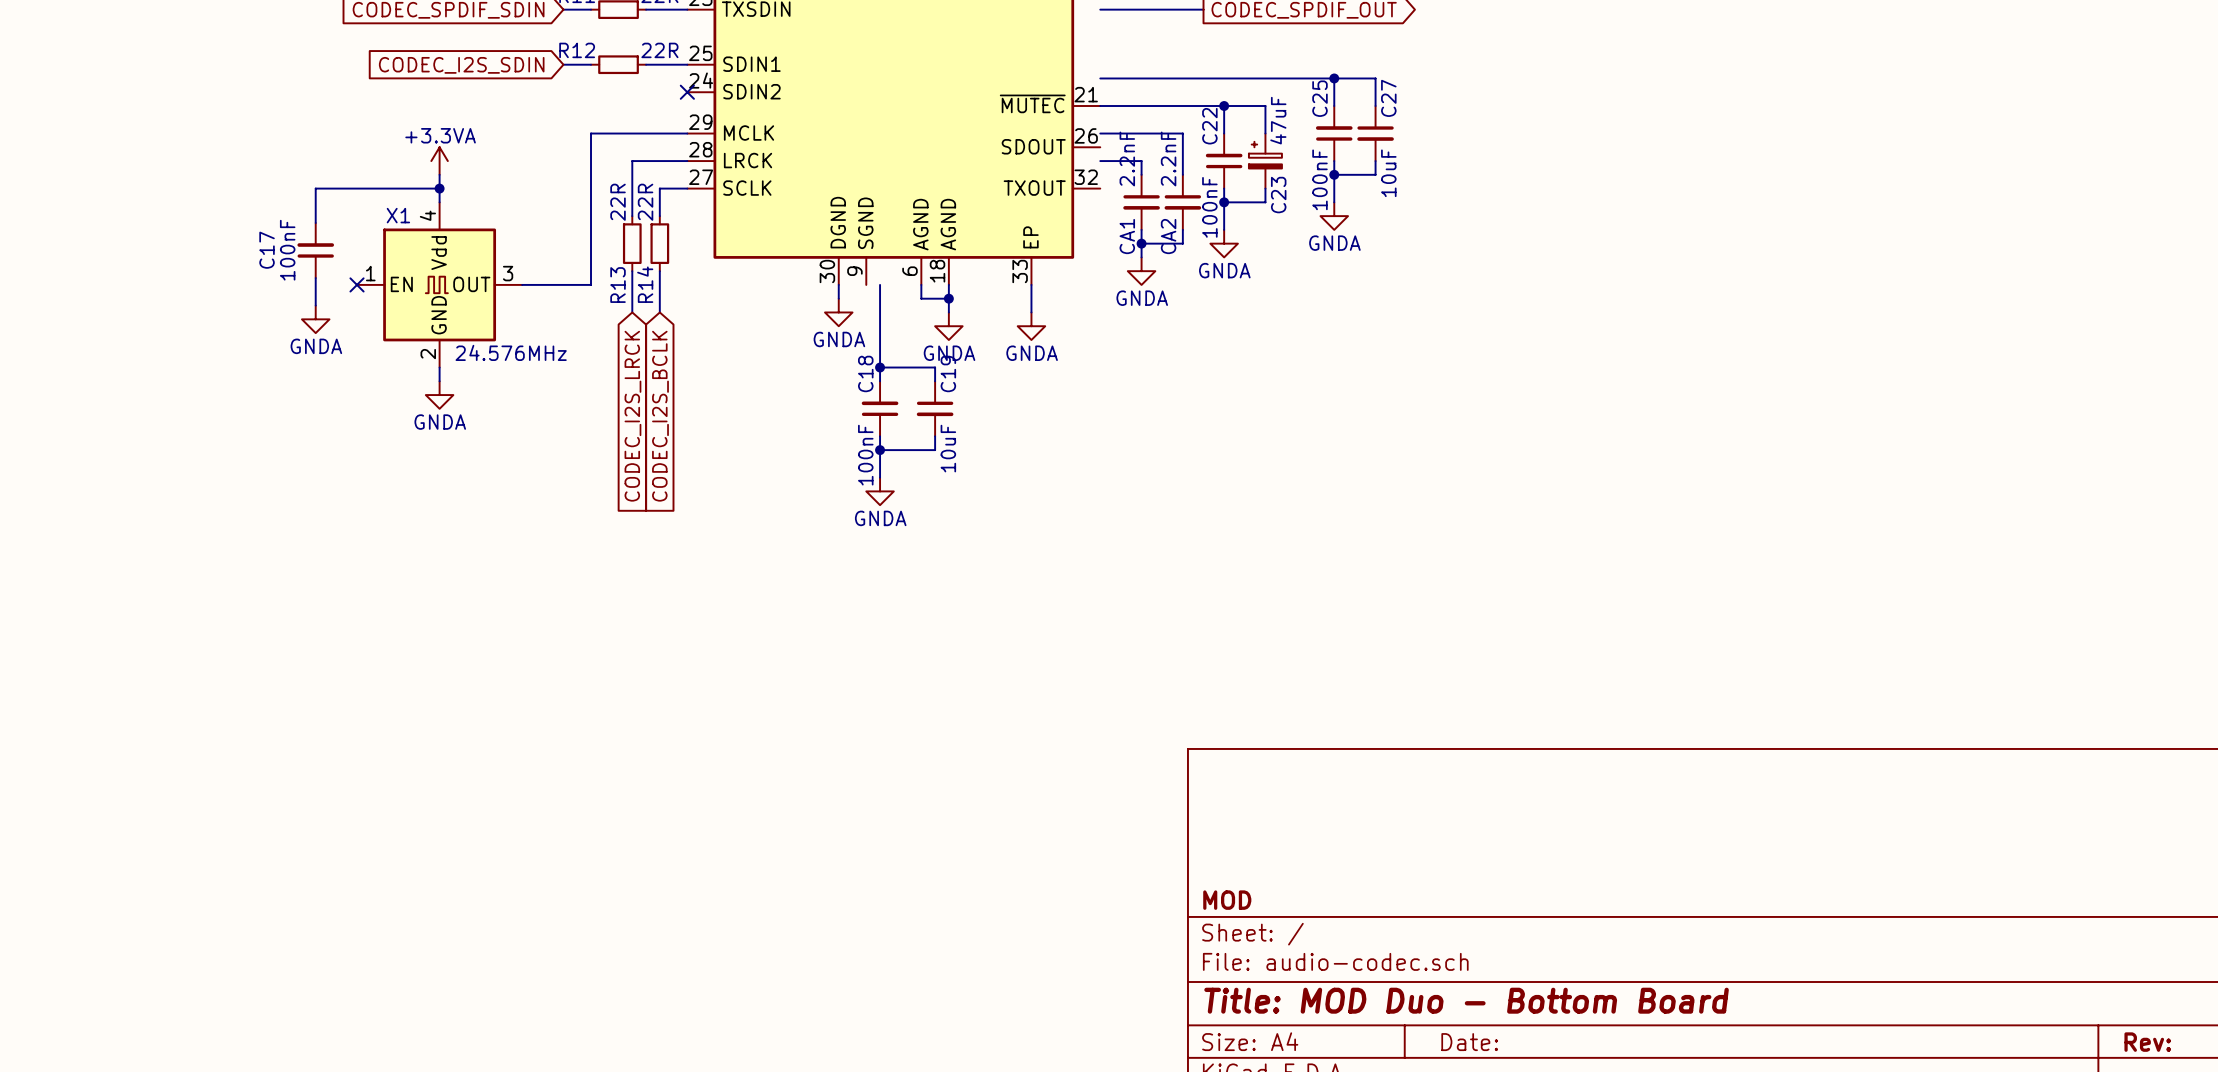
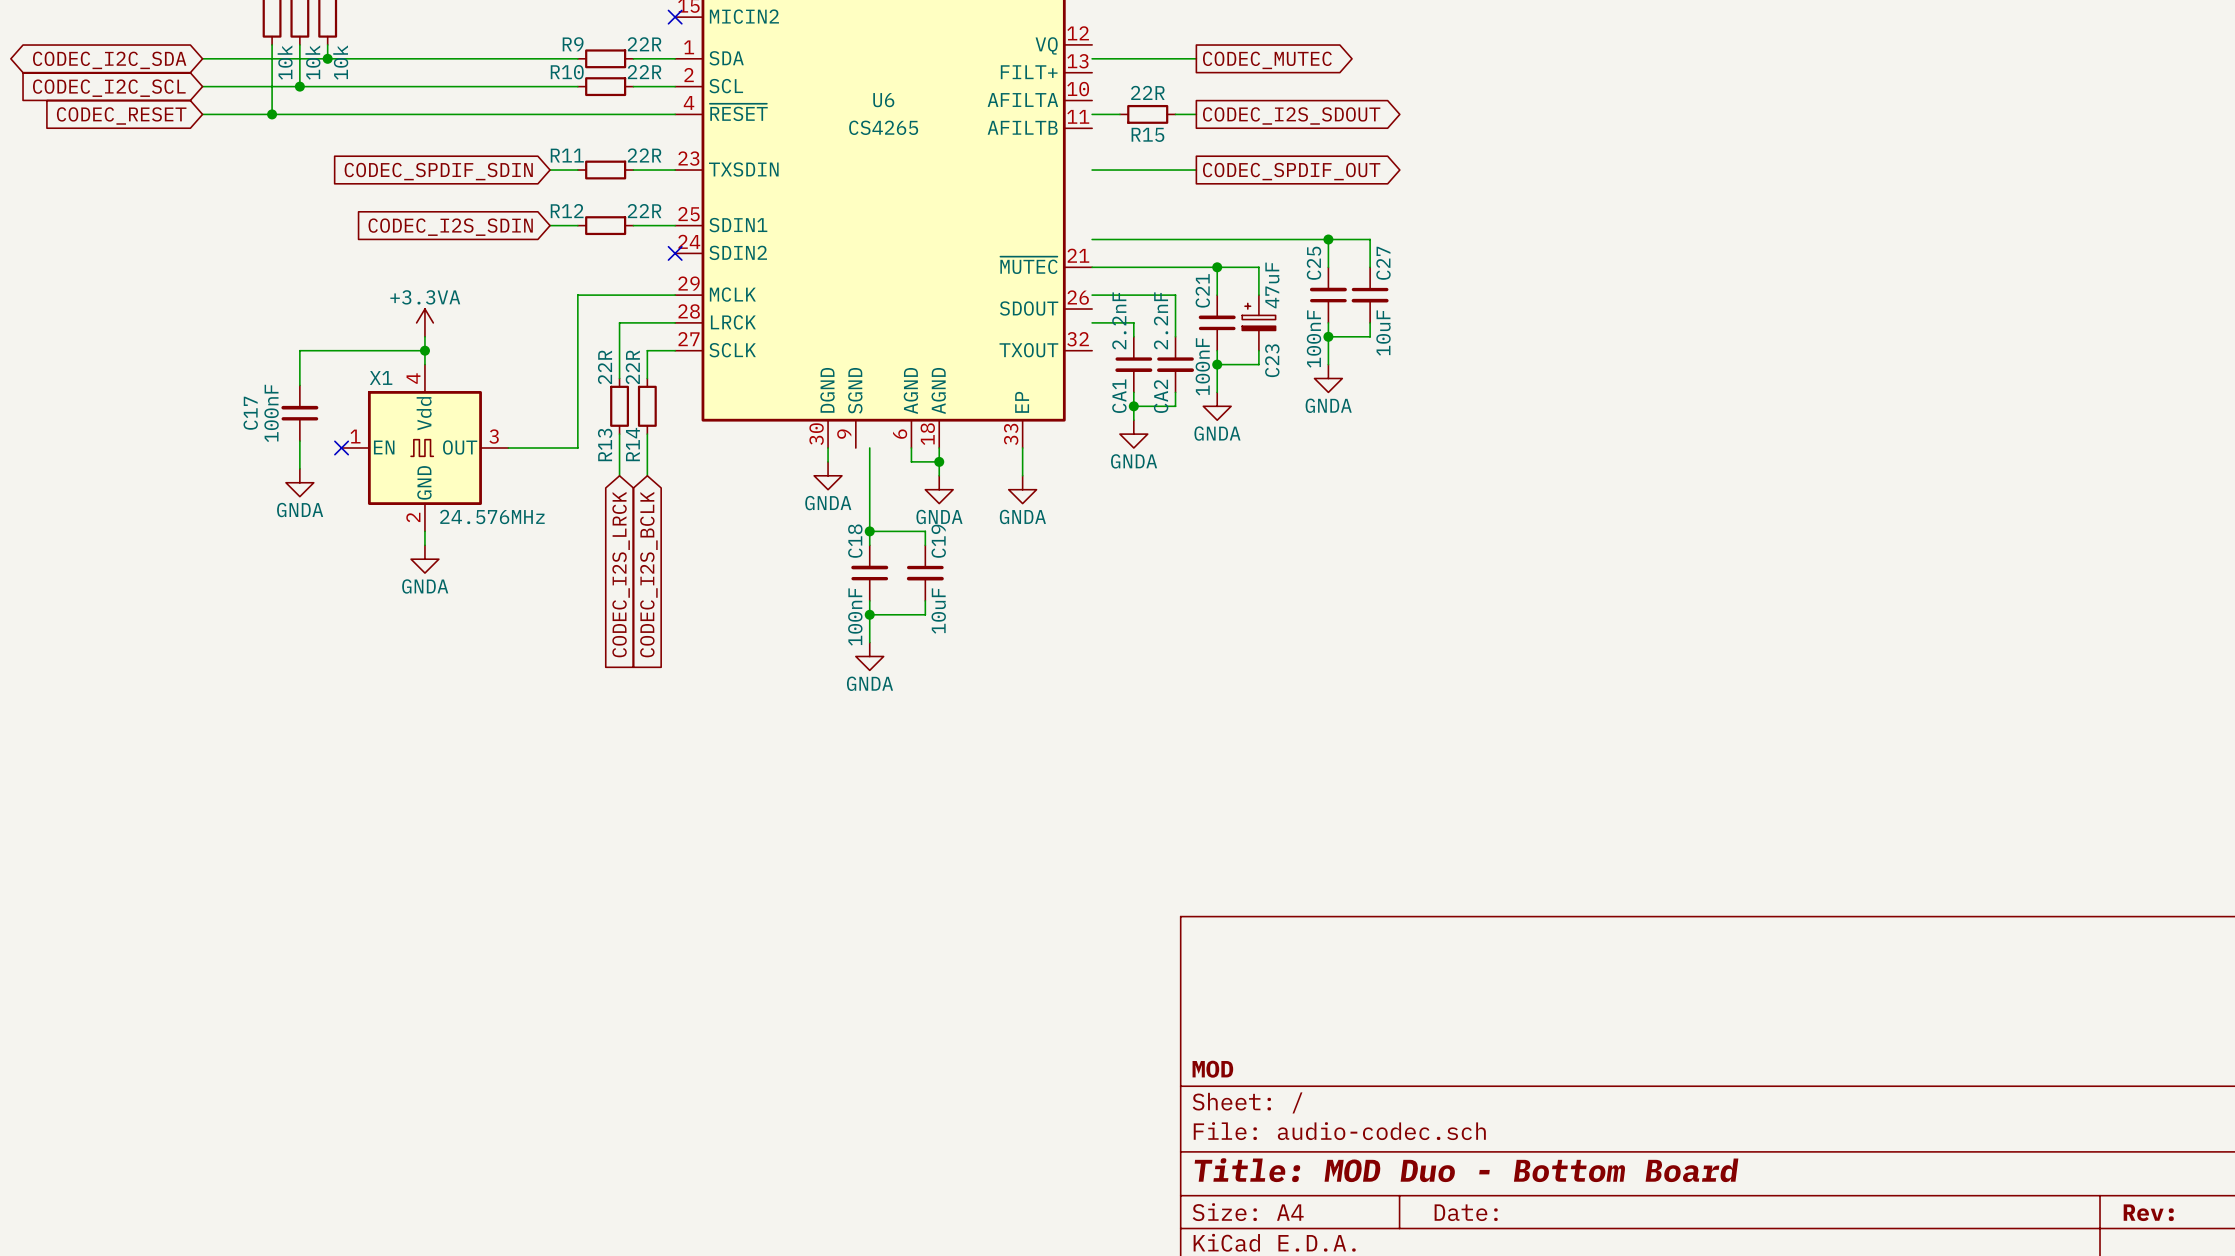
C22 name: C22 (1209, 126) -> C21 (1202, 290)

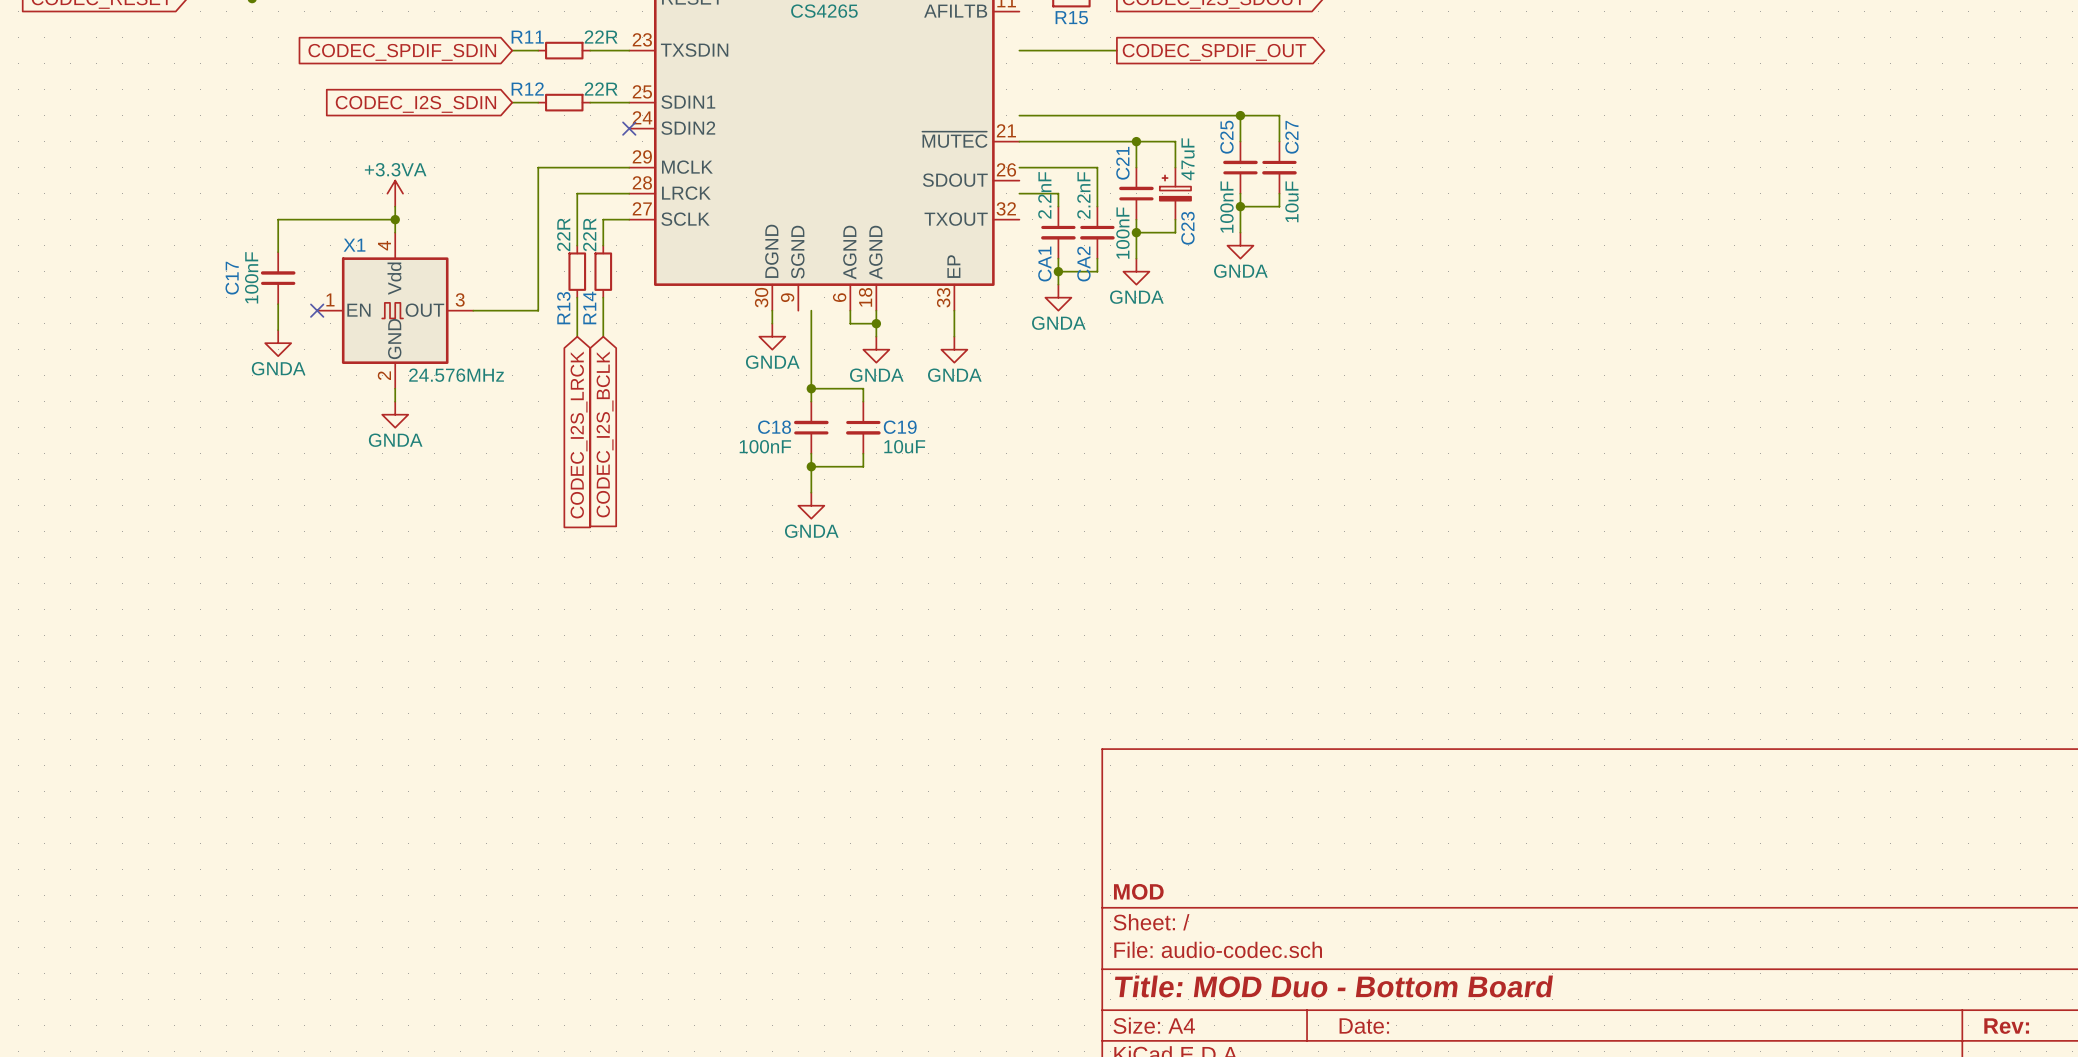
C18 name rotation: 0° (855, 541) -> 90° clockwise (774, 427)
C18 name position: C18 (855, 541) -> C18 (774, 427)
C19 name rotation: 0° (938, 541) -> 90° clockwise (900, 427)
C19 name position: C19 (938, 541) -> C19 (900, 427)
C19 value rotation: 0° (938, 611) -> 90° clockwise (904, 446)
C18 value rotation: 0° (855, 617) -> 90° clockwise (765, 446)

